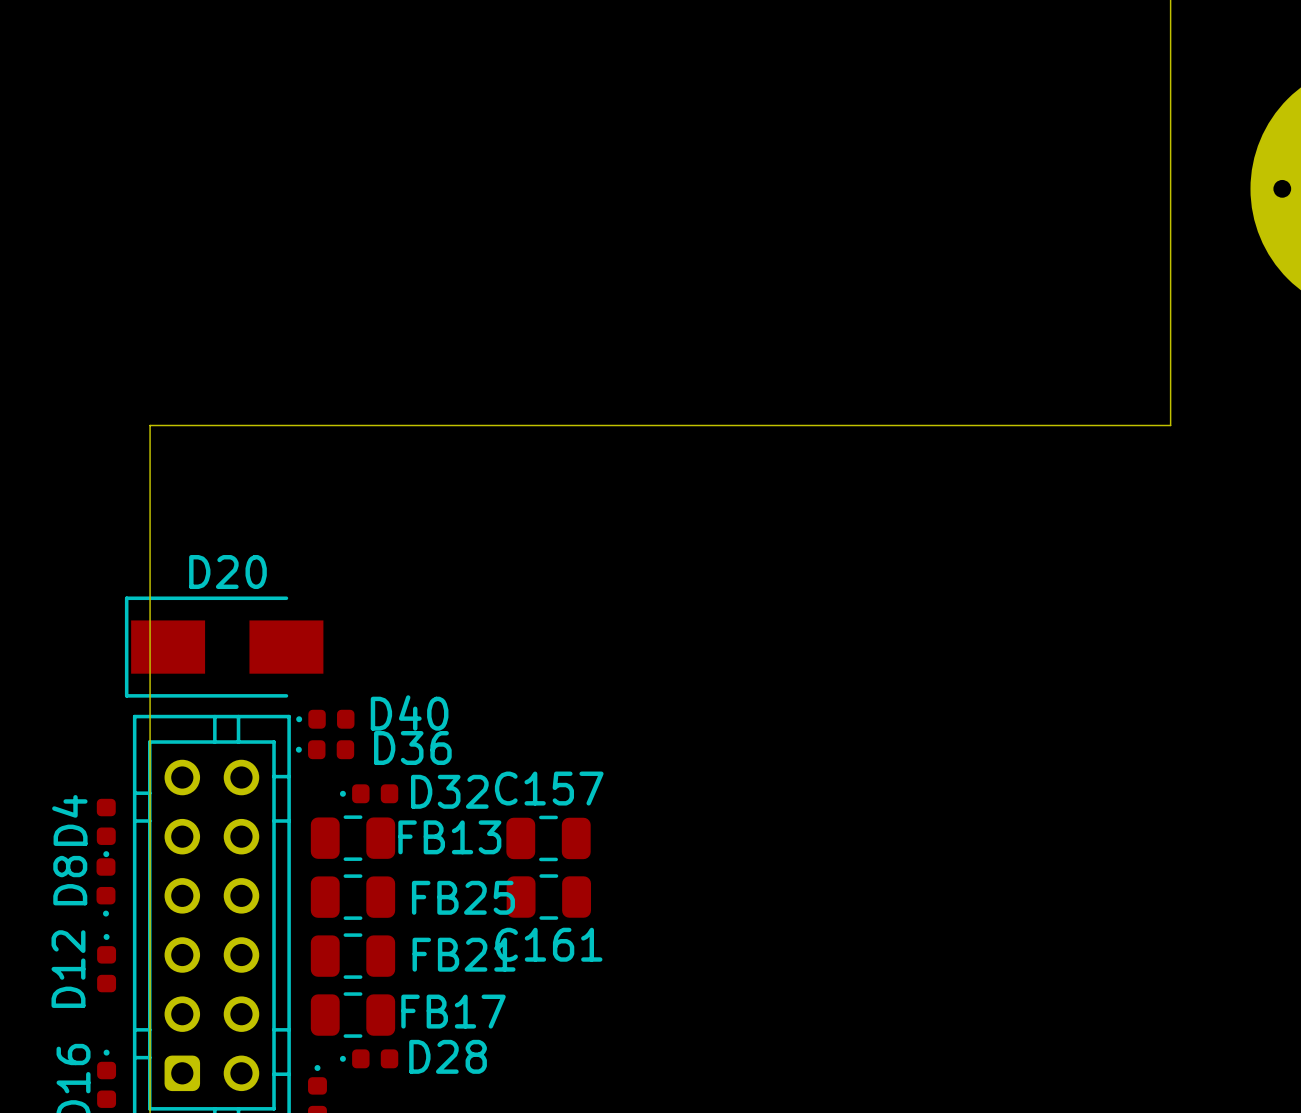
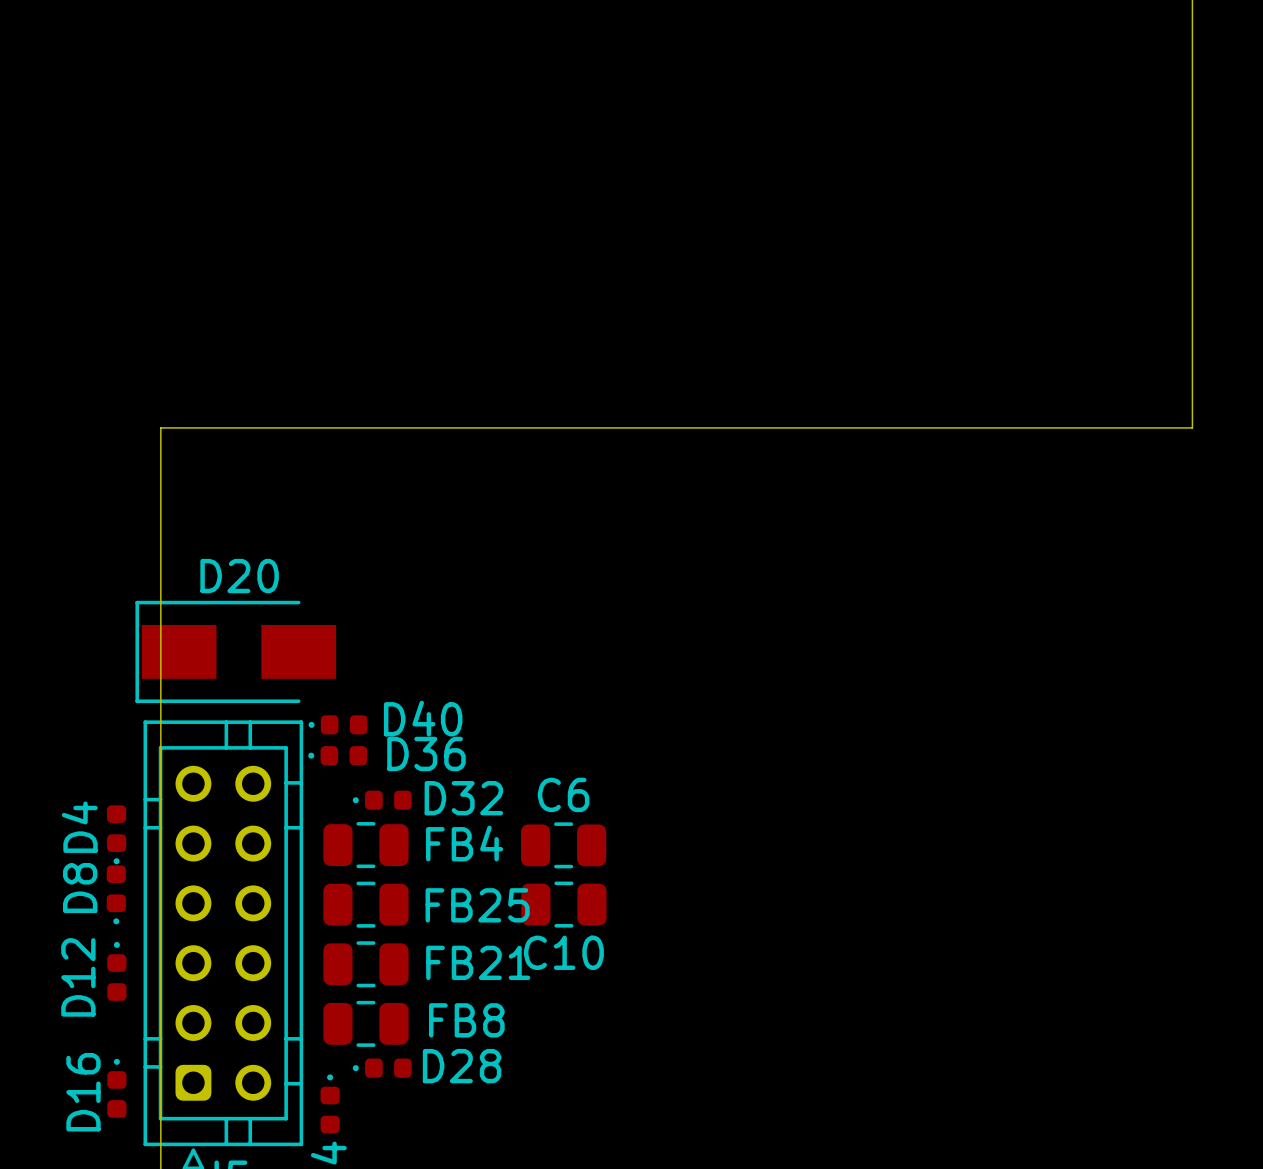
C157 name: C157 (549, 788) -> C6 (563, 794)
FB13 name: FB13 (449, 837) -> FB4 (464, 843)
C161 name: C161 (548, 944) -> C10 (563, 952)
FB17 name: FB17 (453, 1011) -> FB8 (466, 1020)

